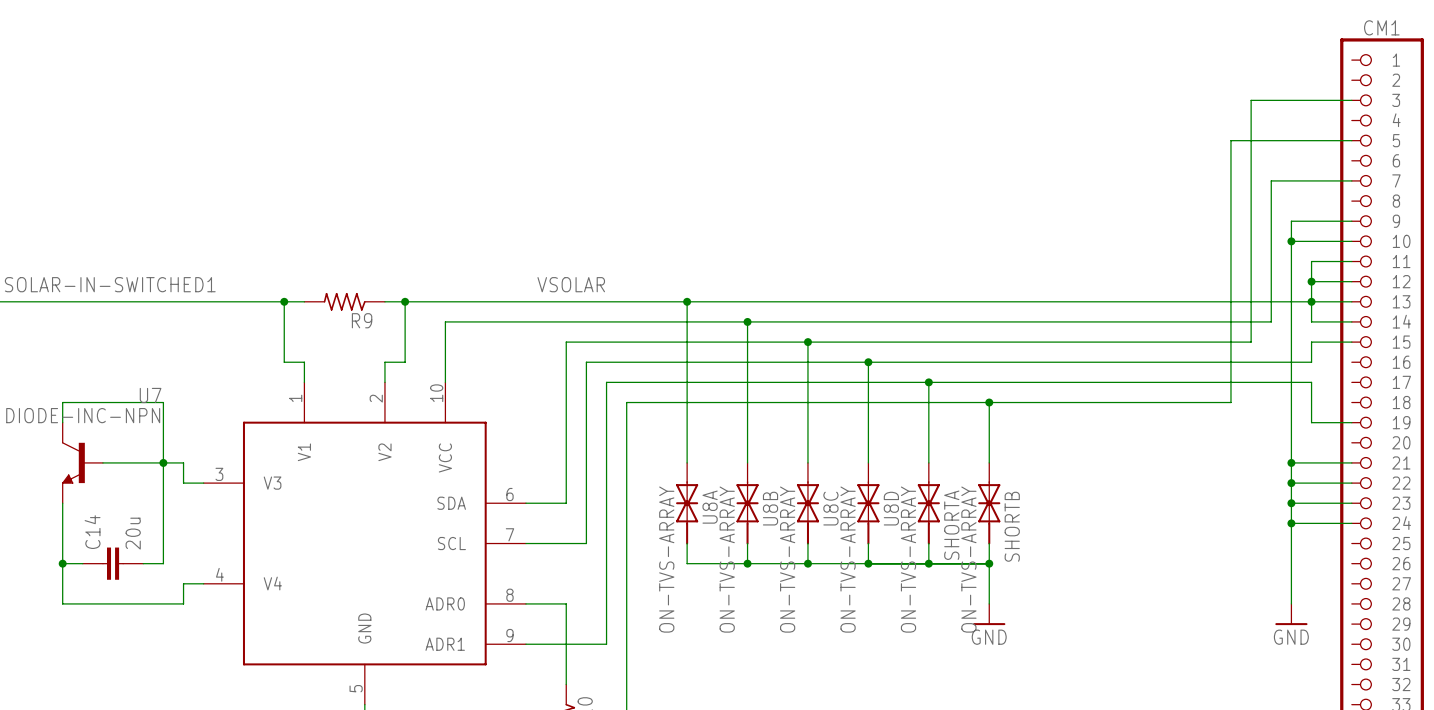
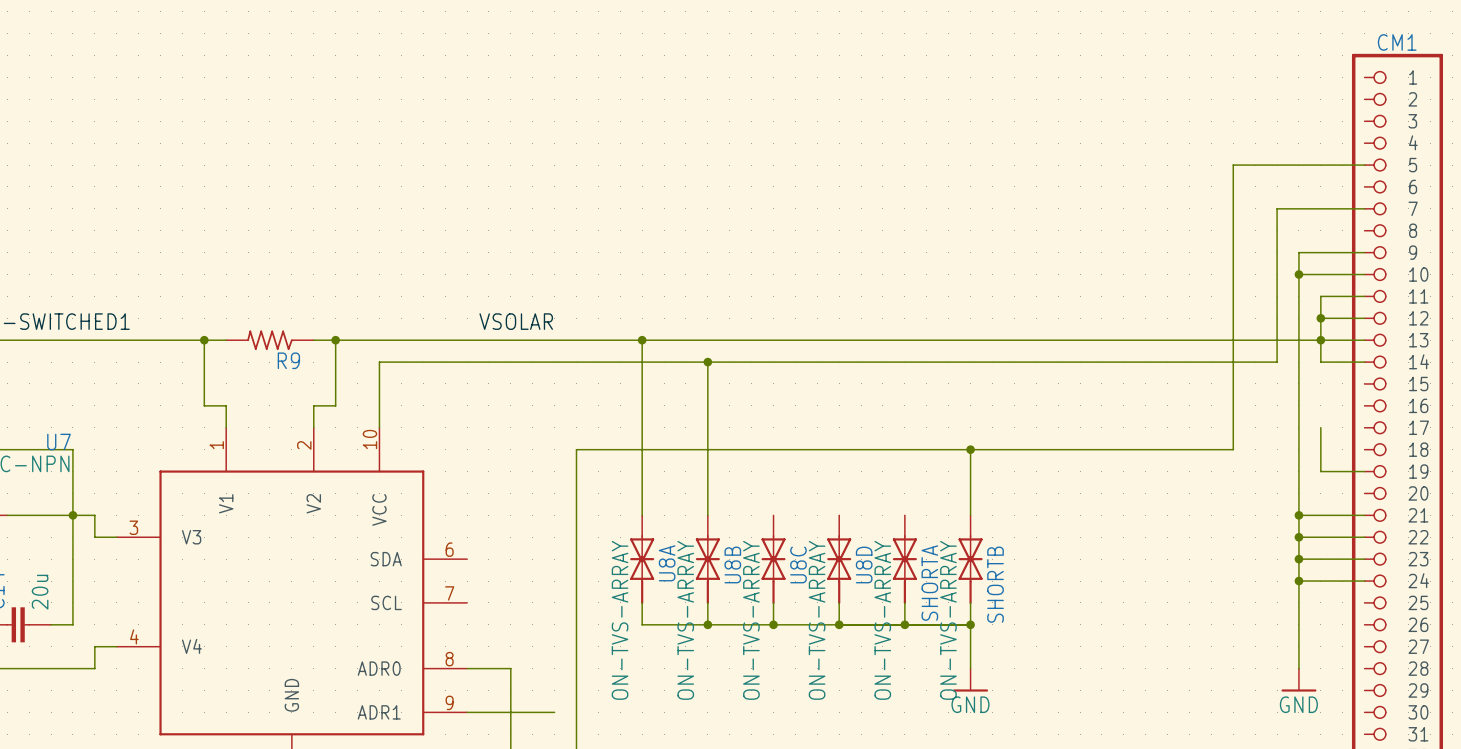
wire: (1351, 100) (1251, 100) (1251, 342) (566, 342) (566, 503) (525, 503) -> none
wire: (807, 342) (807, 462) -> none
junction: (807, 342) -> none
wire: (1351, 342) (1311, 342) (1311, 362) (586, 362) (586, 543) (525, 543) -> none
wire: (868, 362) (868, 462) -> none
junction: (868, 362) -> none
wire: (928, 382) (928, 462) -> none
junction: (928, 382) -> none
wire: (1311, 382) (606, 382) (606, 644) -> none

